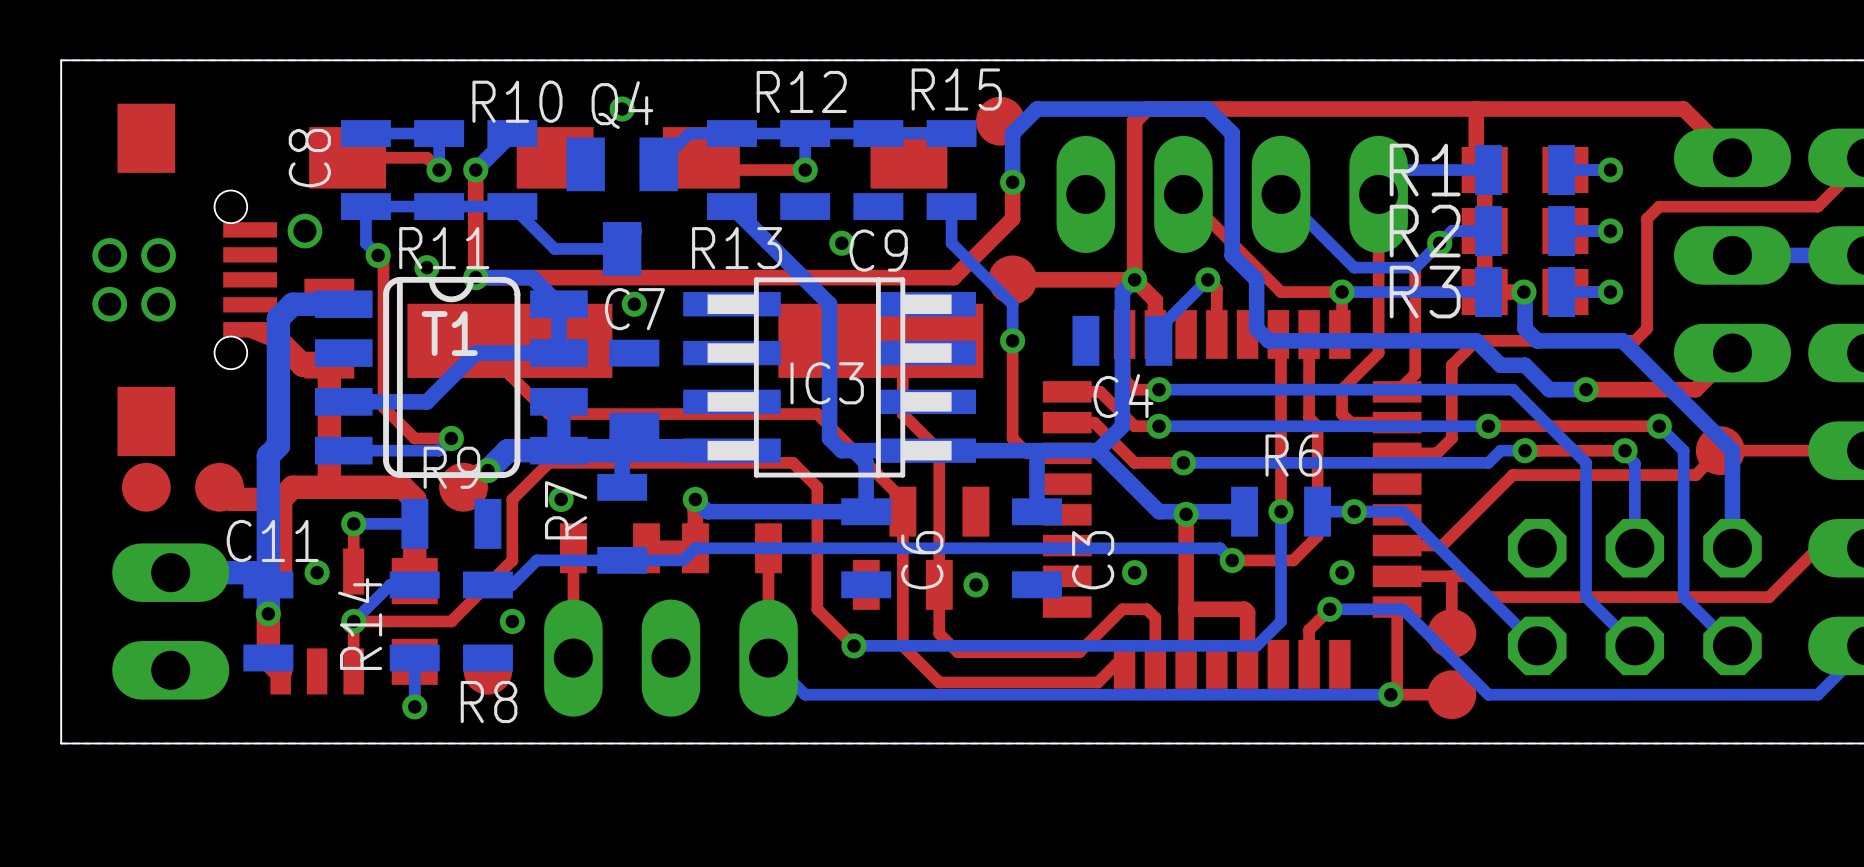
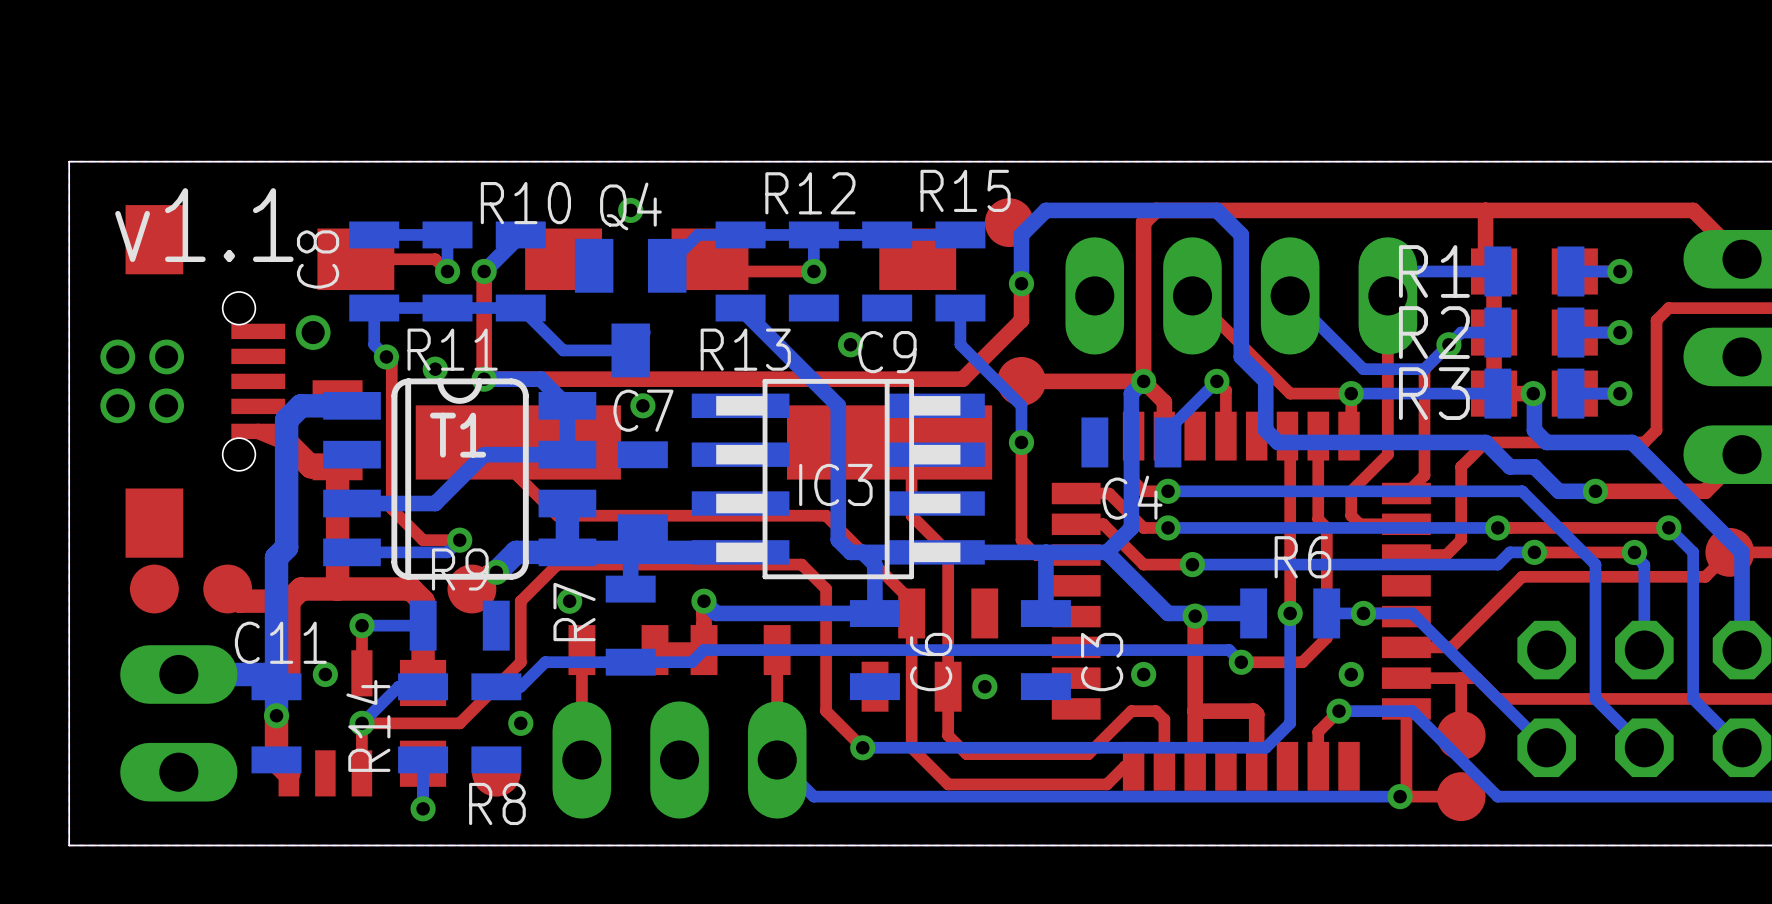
text: none -> v1.1 (204, 225)

